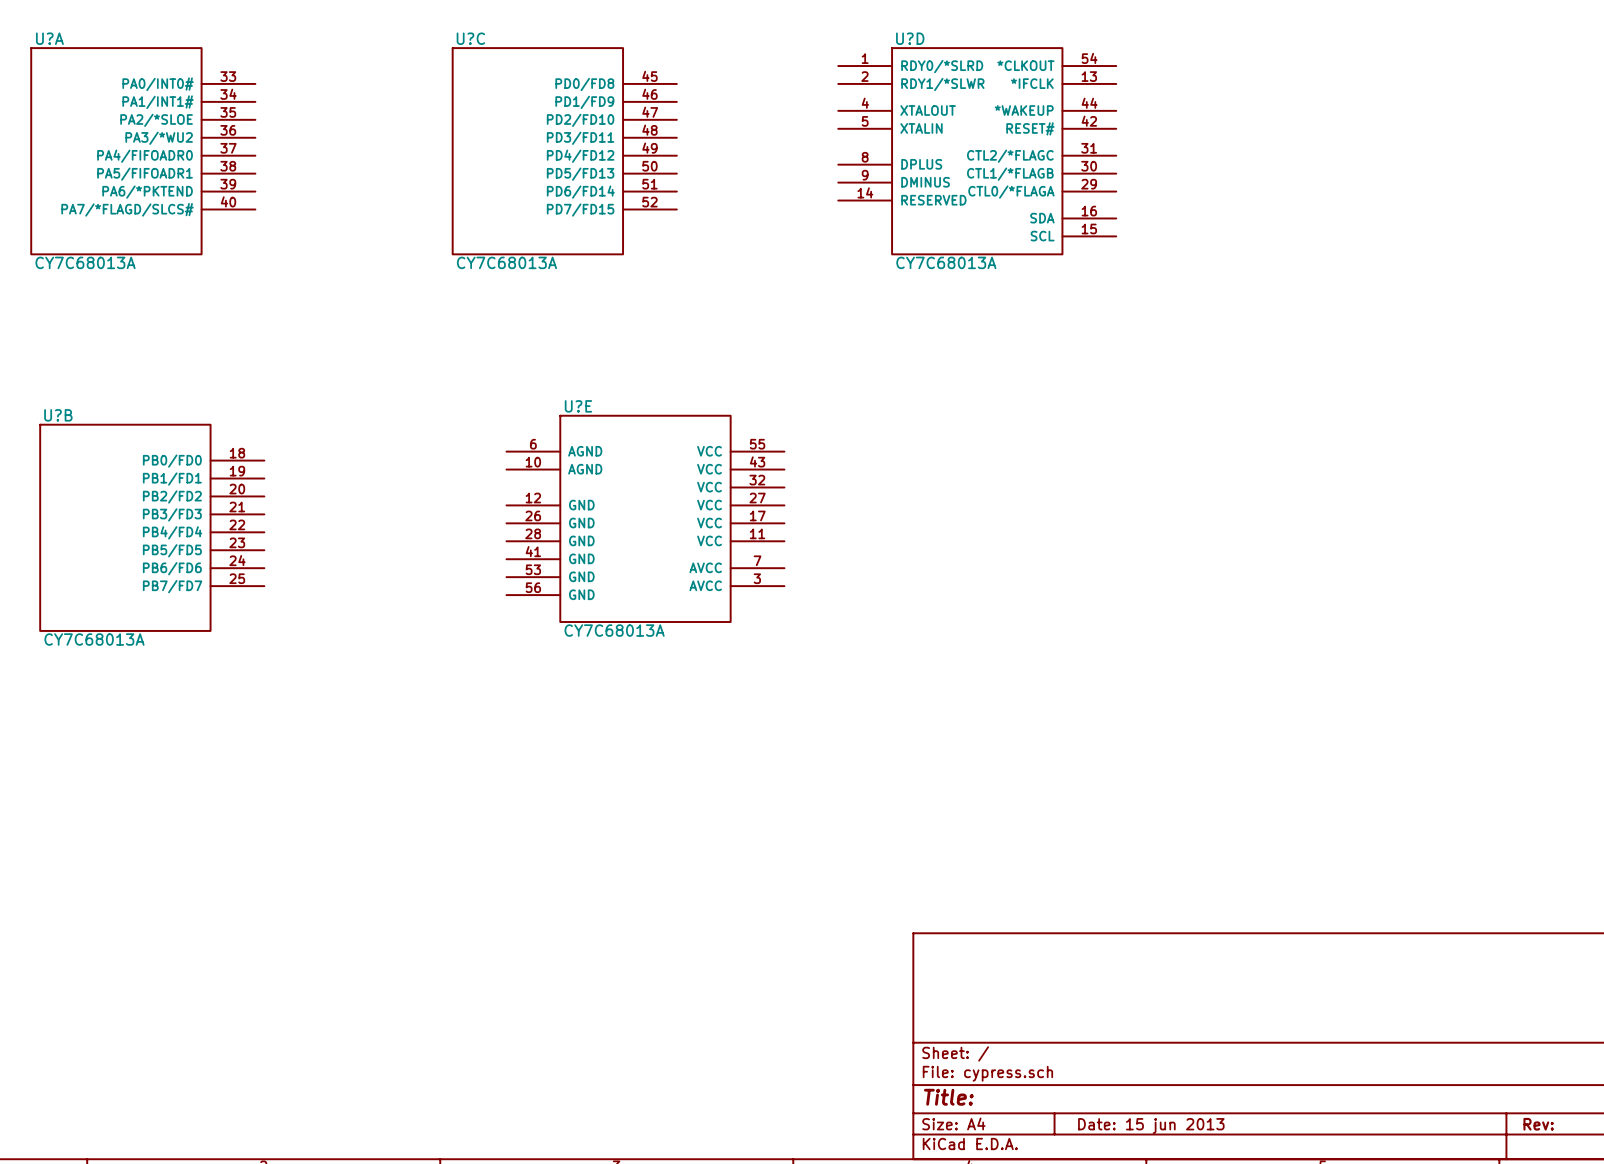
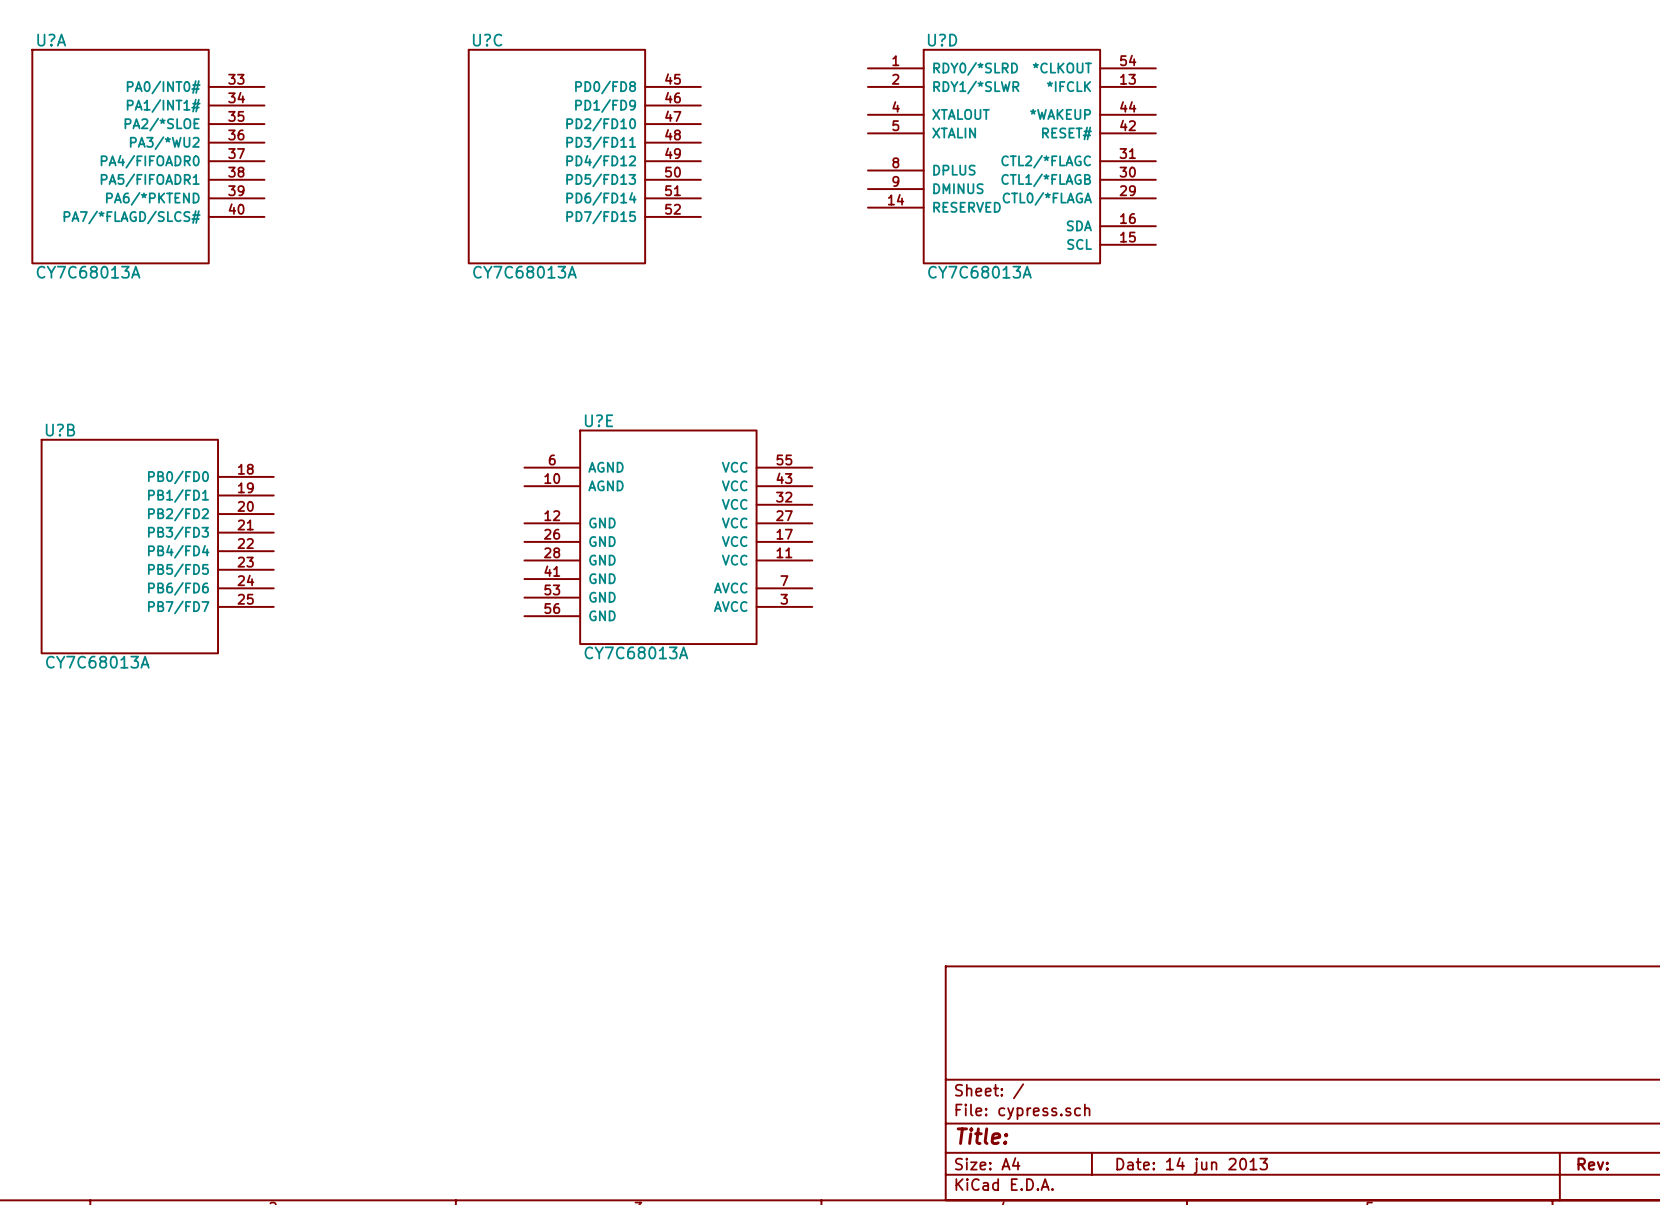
title block: Date: 15 jun 2013 (1151, 1125) -> Date: 14 jun 2013 (1192, 1165)

